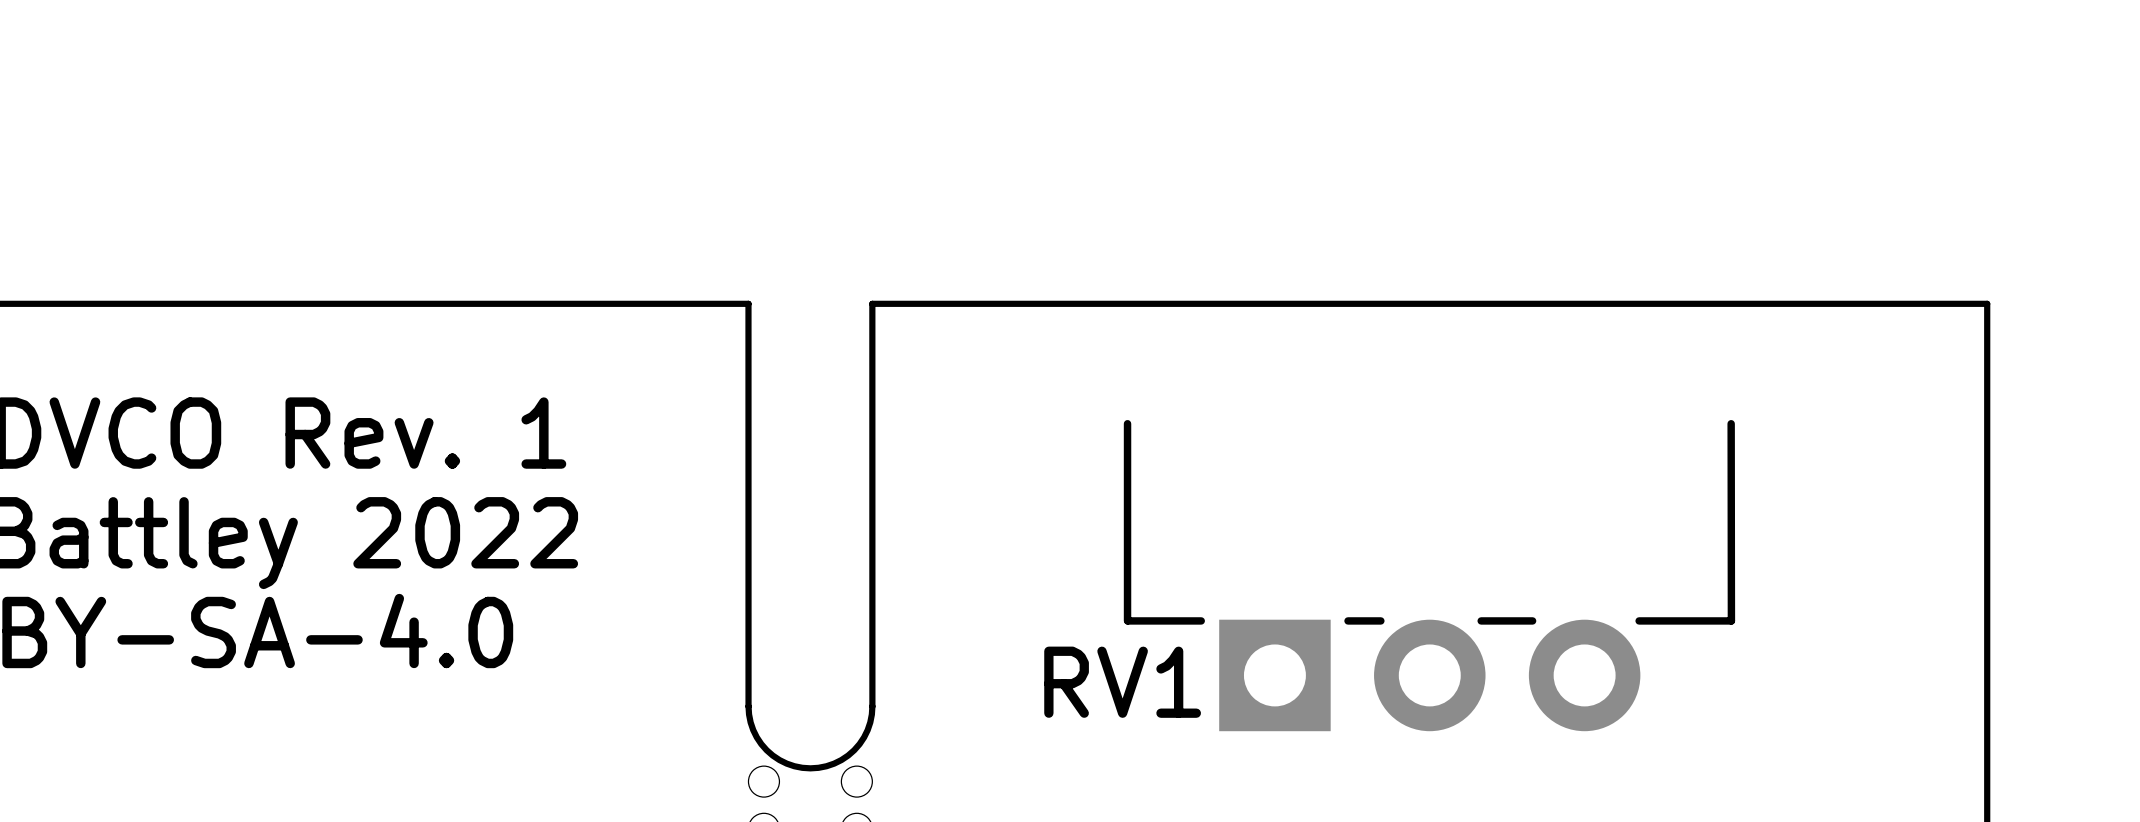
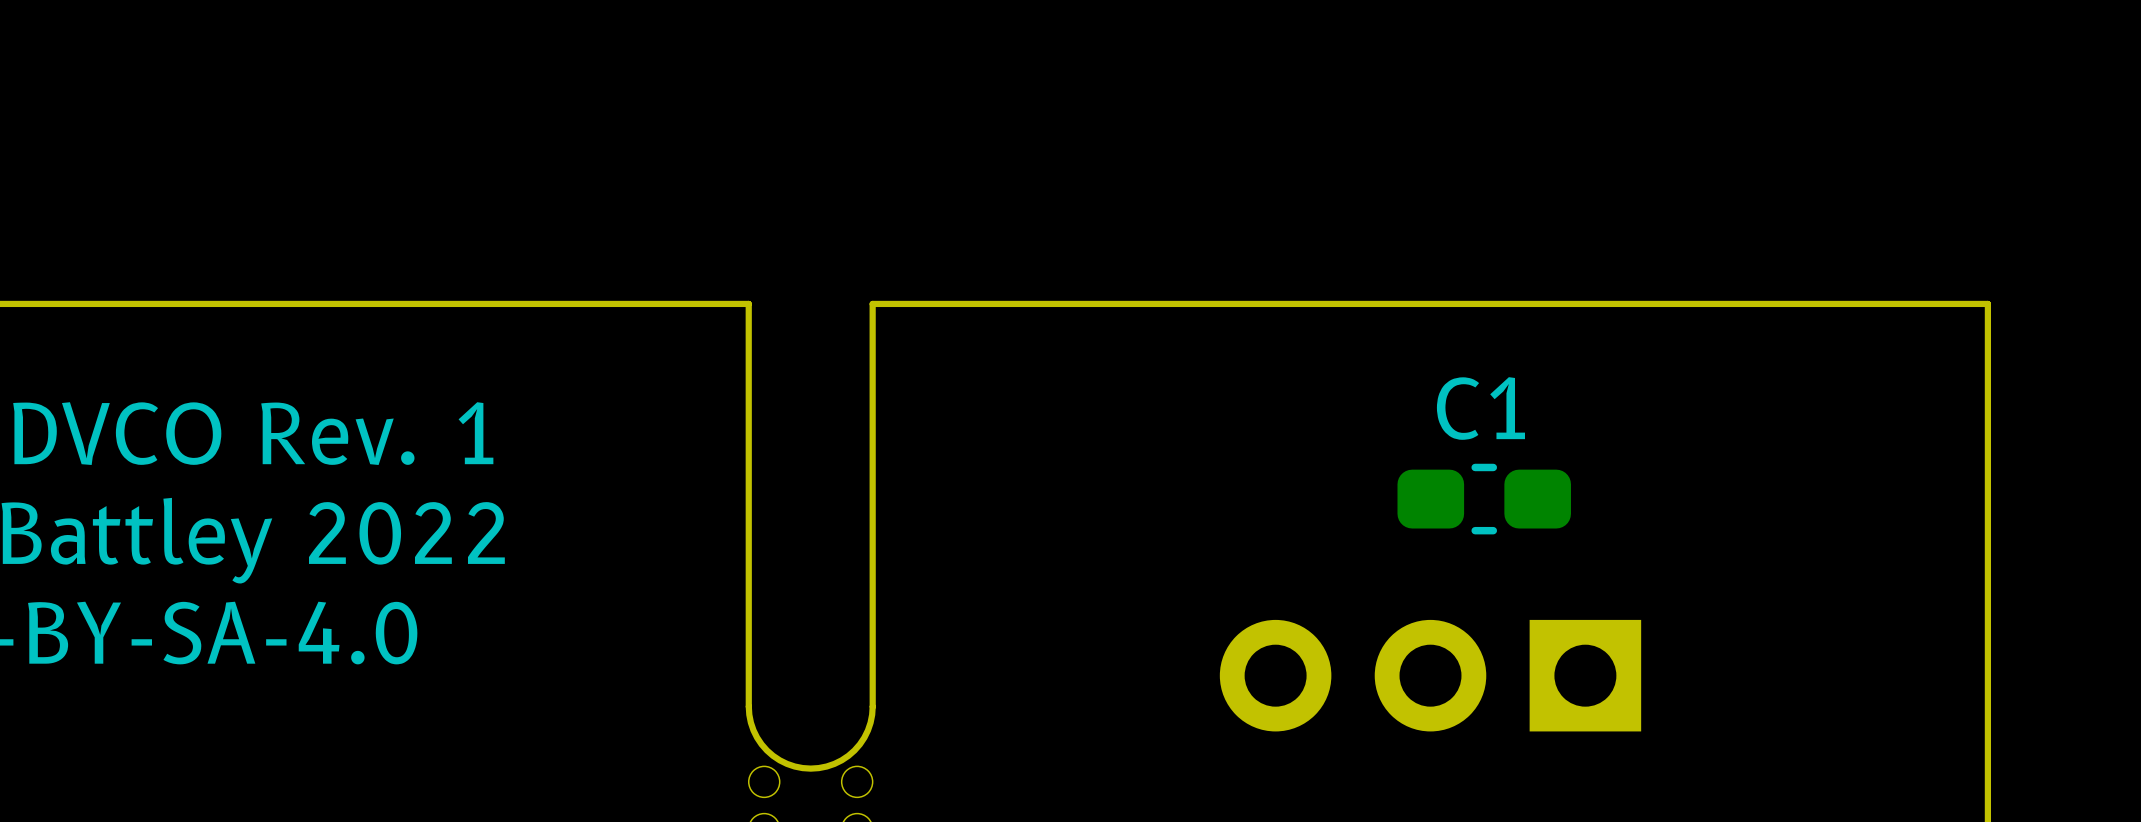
C1: none -> (1484, 499)
RV1 side: bottom (1429, 575) -> top (1430, 675)

